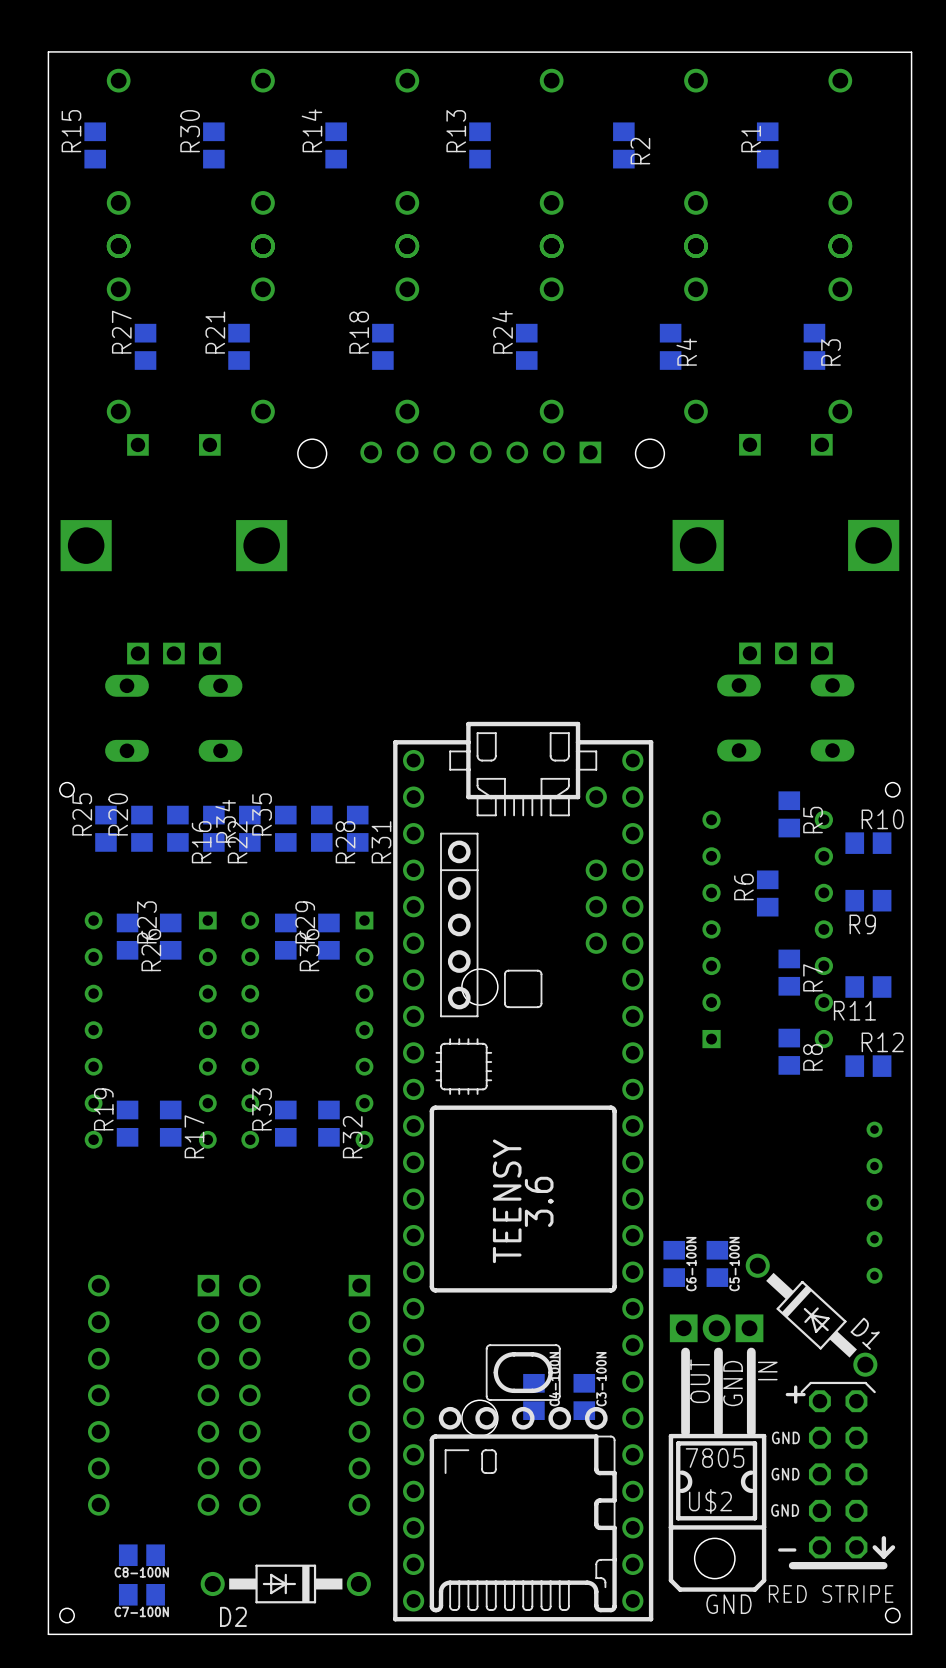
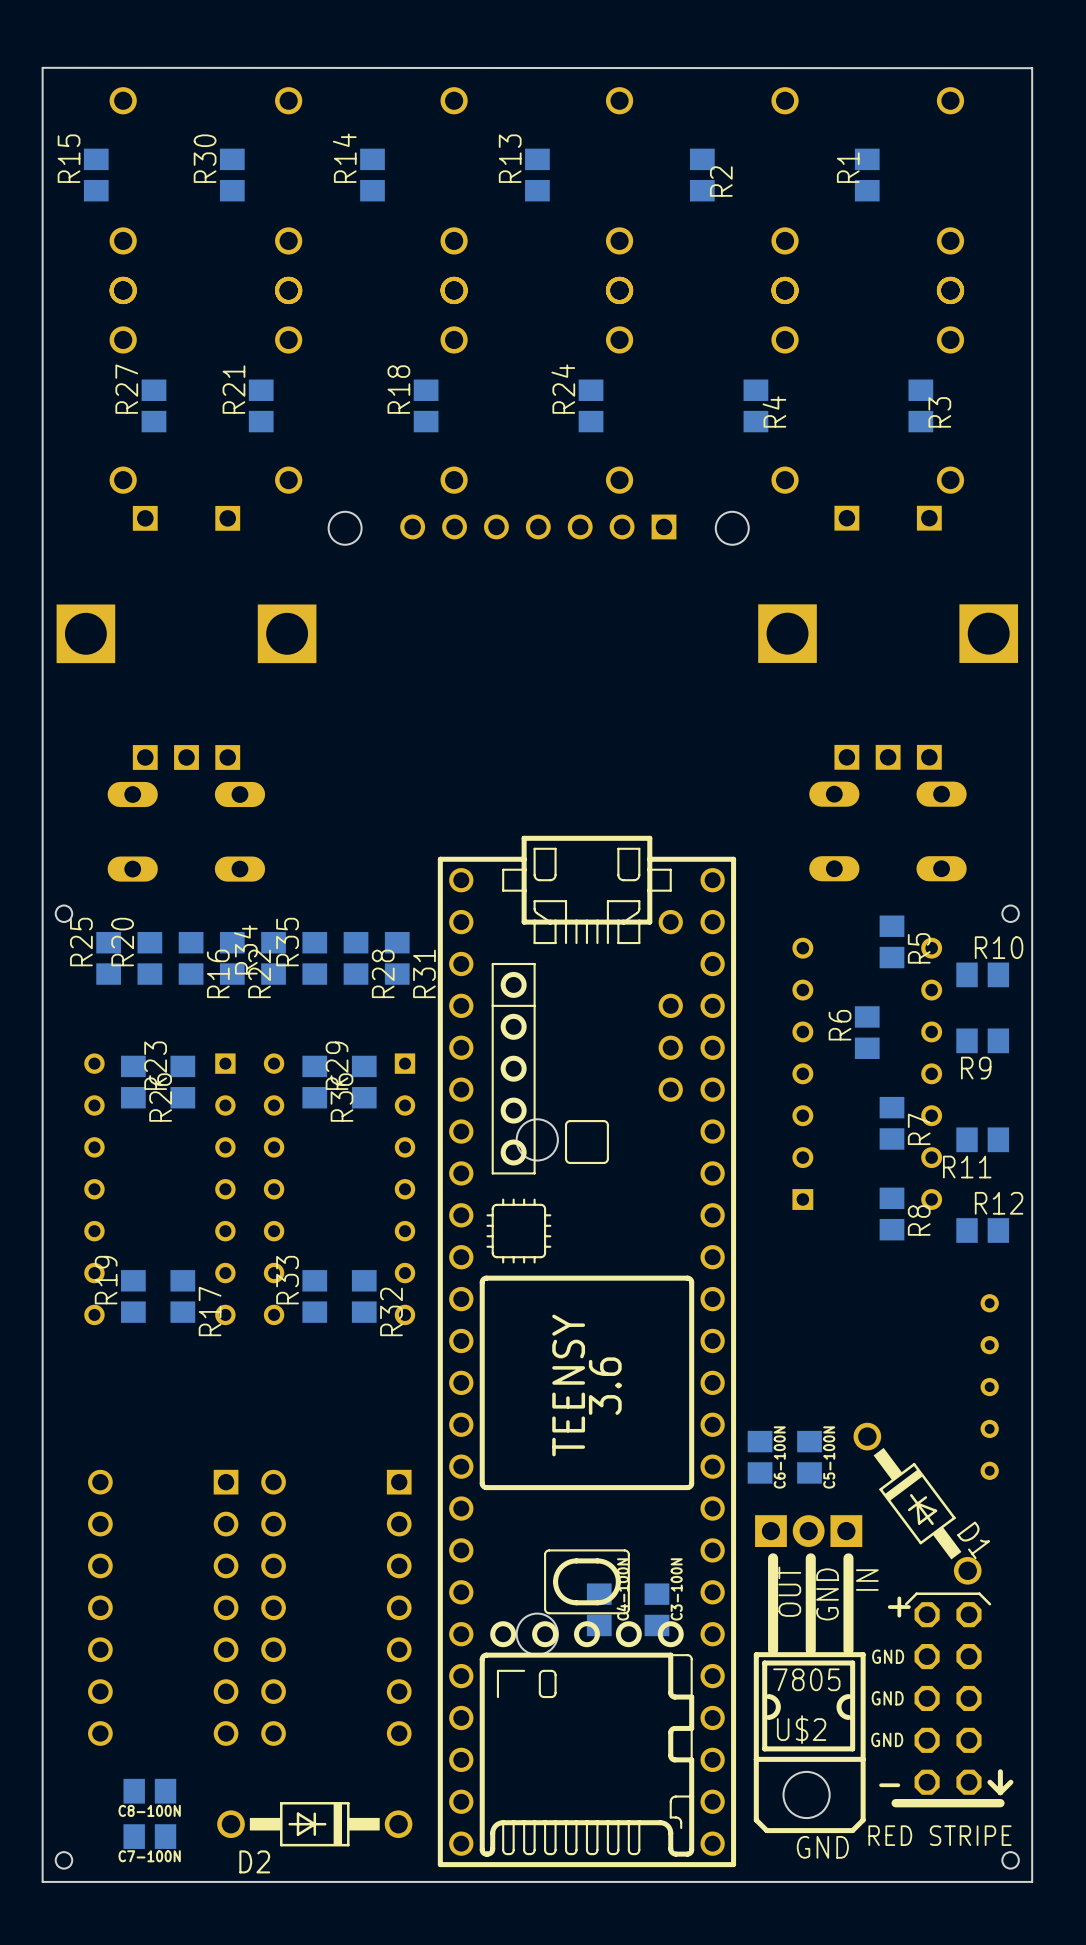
D1 rotation: 0° (811, 1315) -> 10.6° clockwise (917, 1503)

